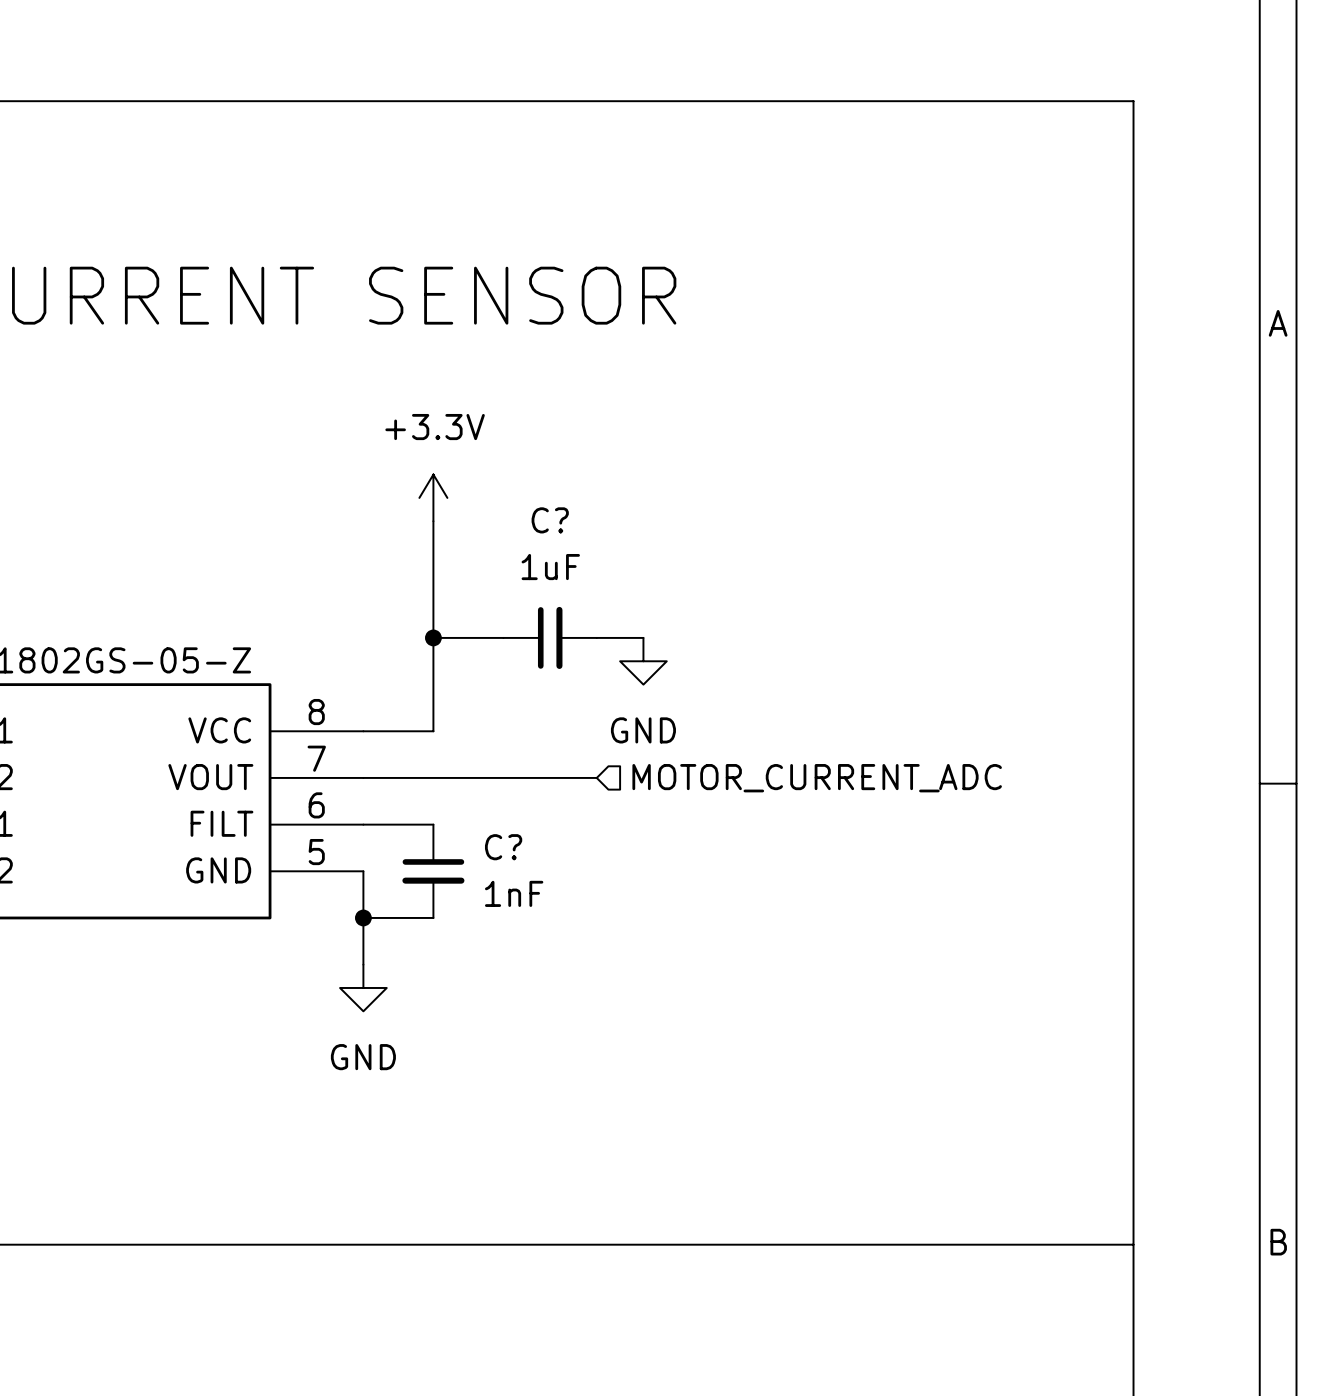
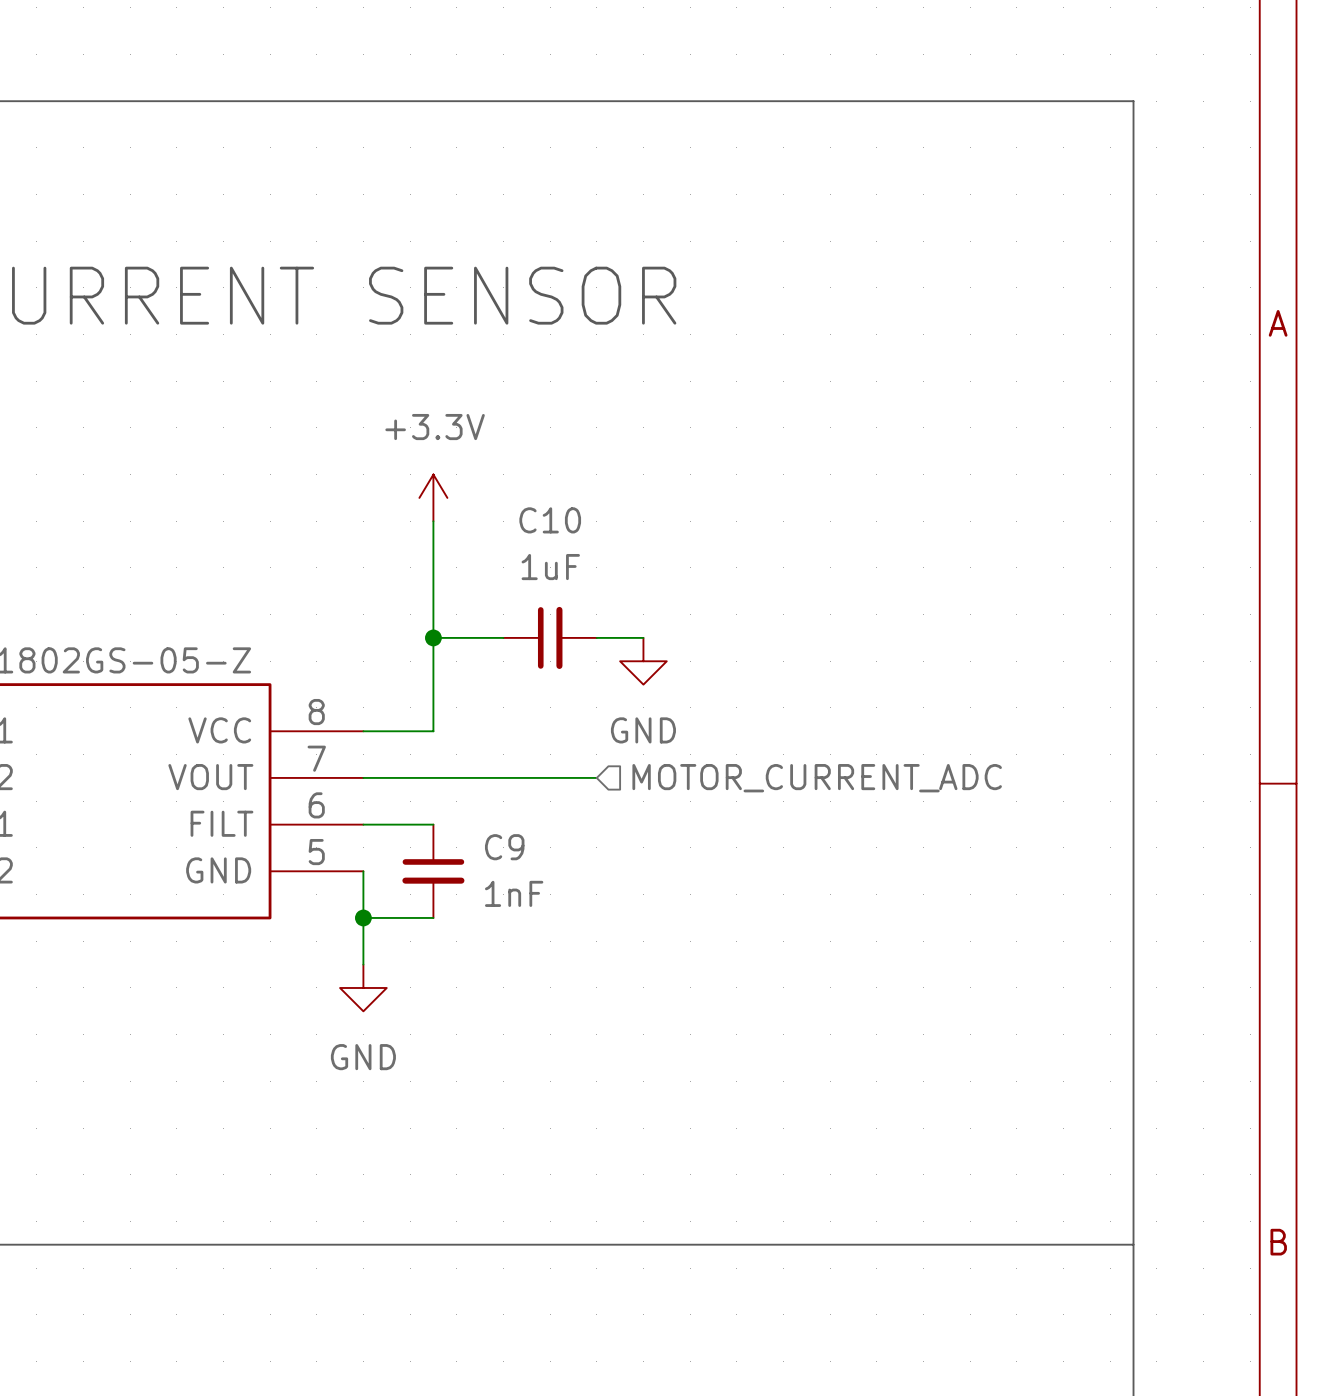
C? name: C? (550, 520) -> C10 (550, 520)
C? name: C? (503, 847) -> C9 (504, 847)

